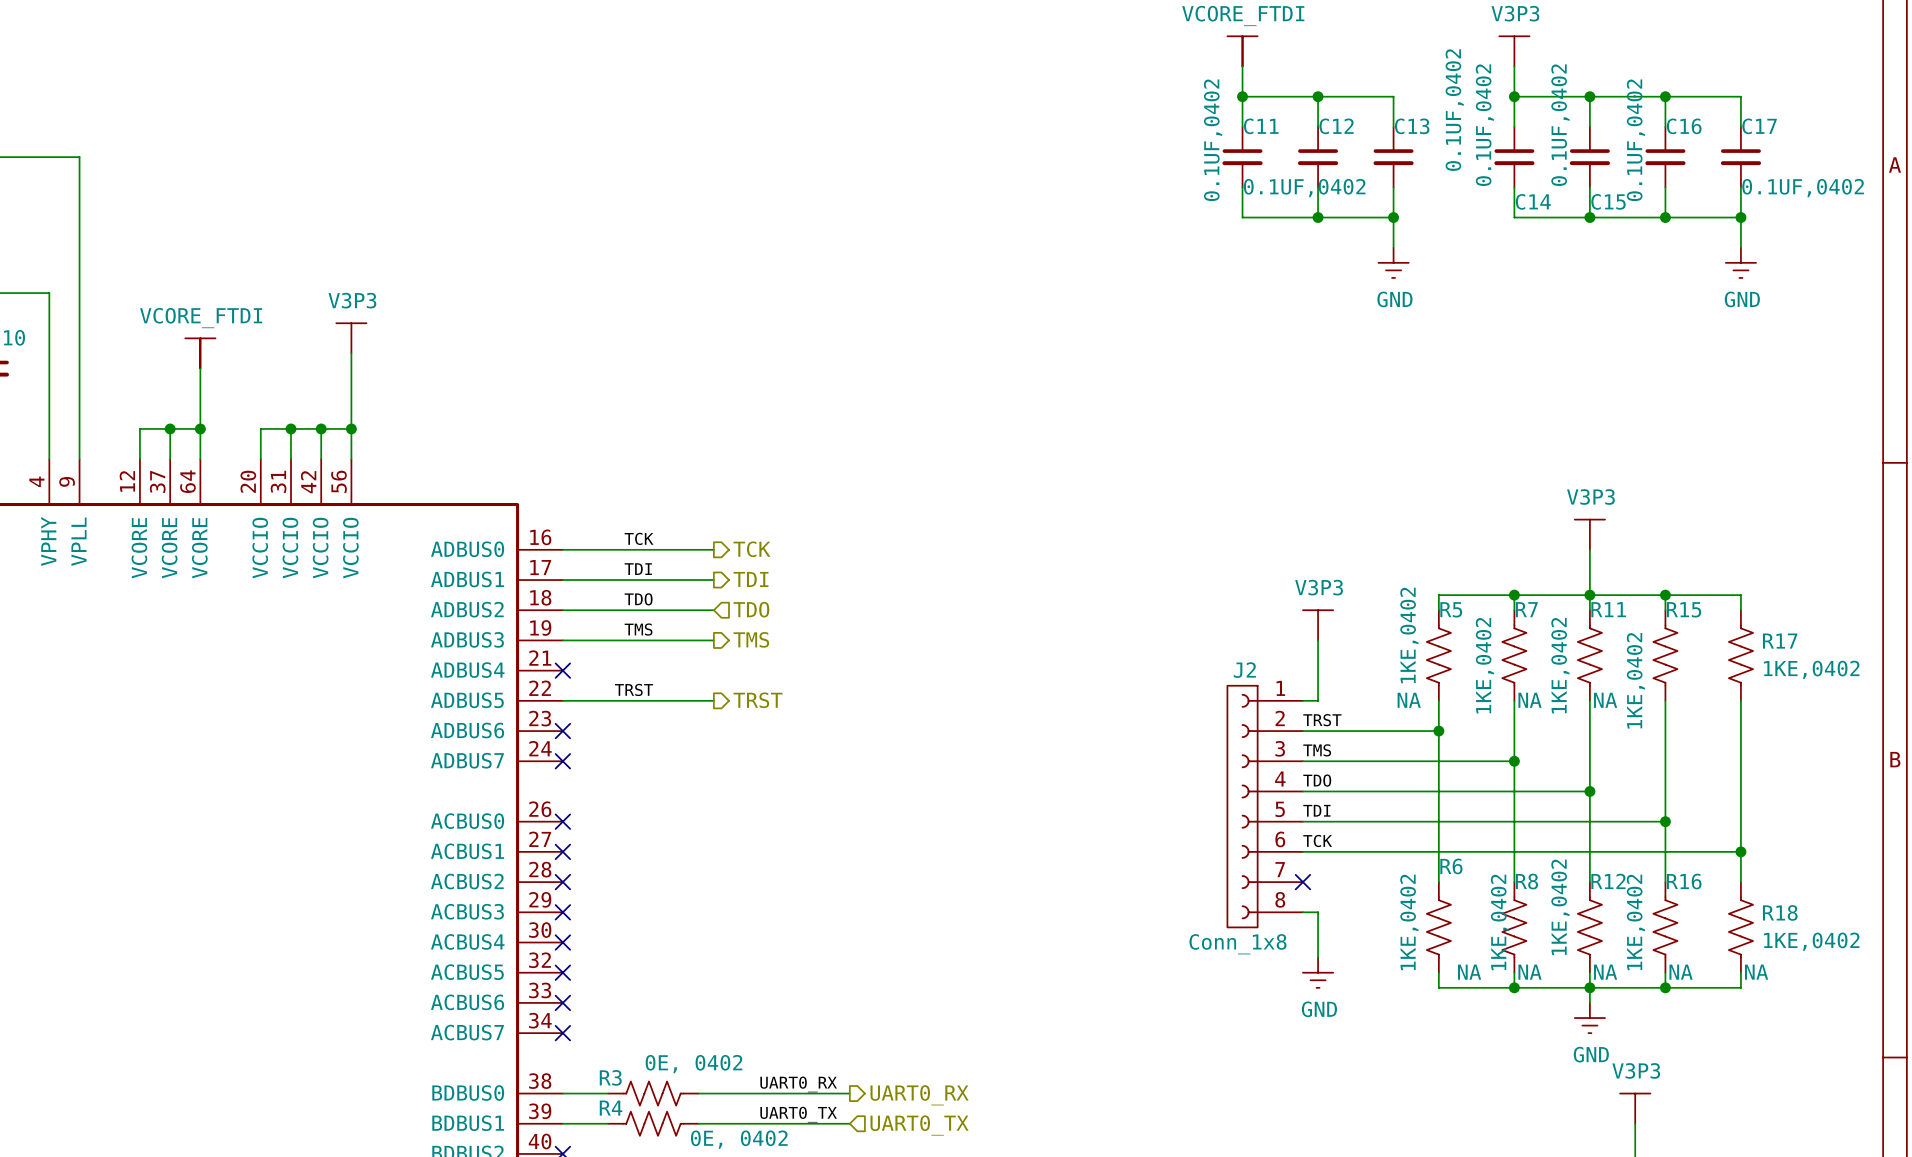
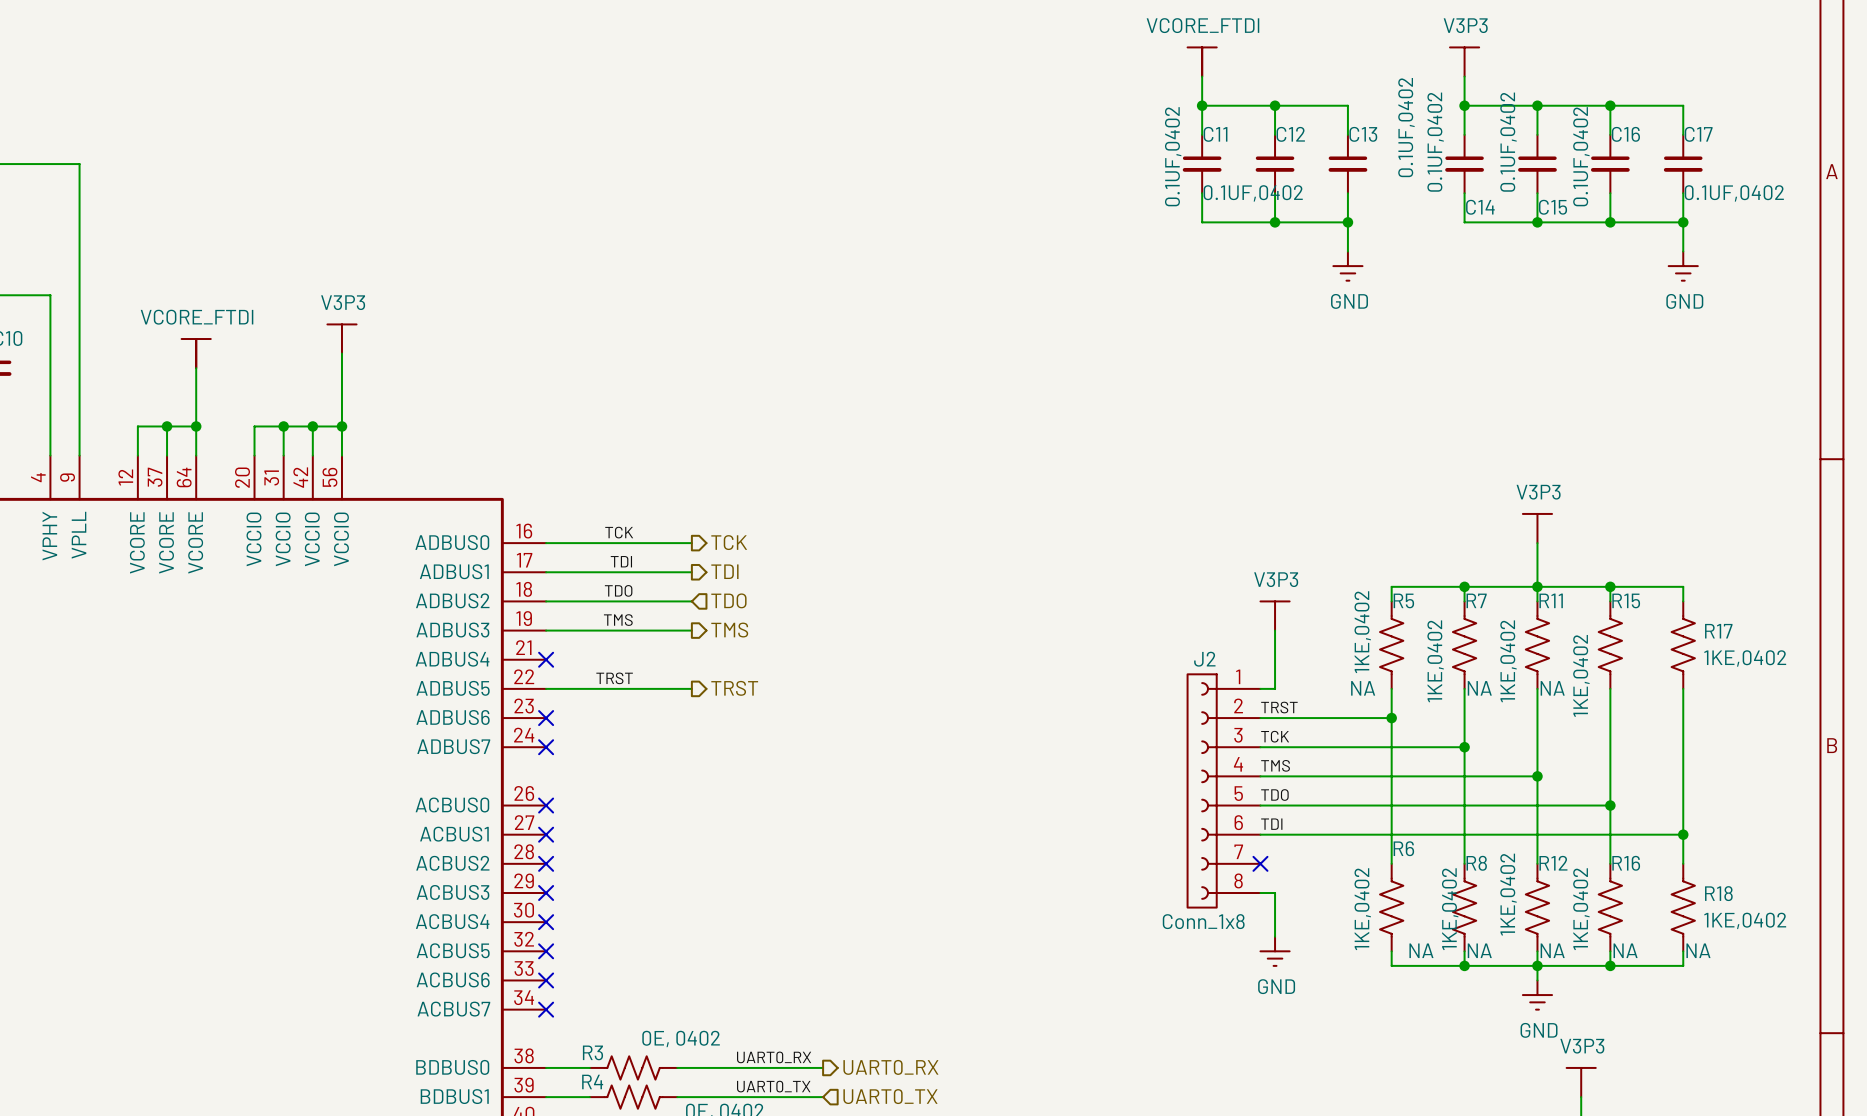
label: TMS (1317, 750) -> TCK (1275, 736)
label: TDO (1317, 780) -> TMS (1275, 765)
label: TDI (1316, 810) -> TDO (1274, 794)
label: TCK (1317, 840) -> TDI (1271, 824)

